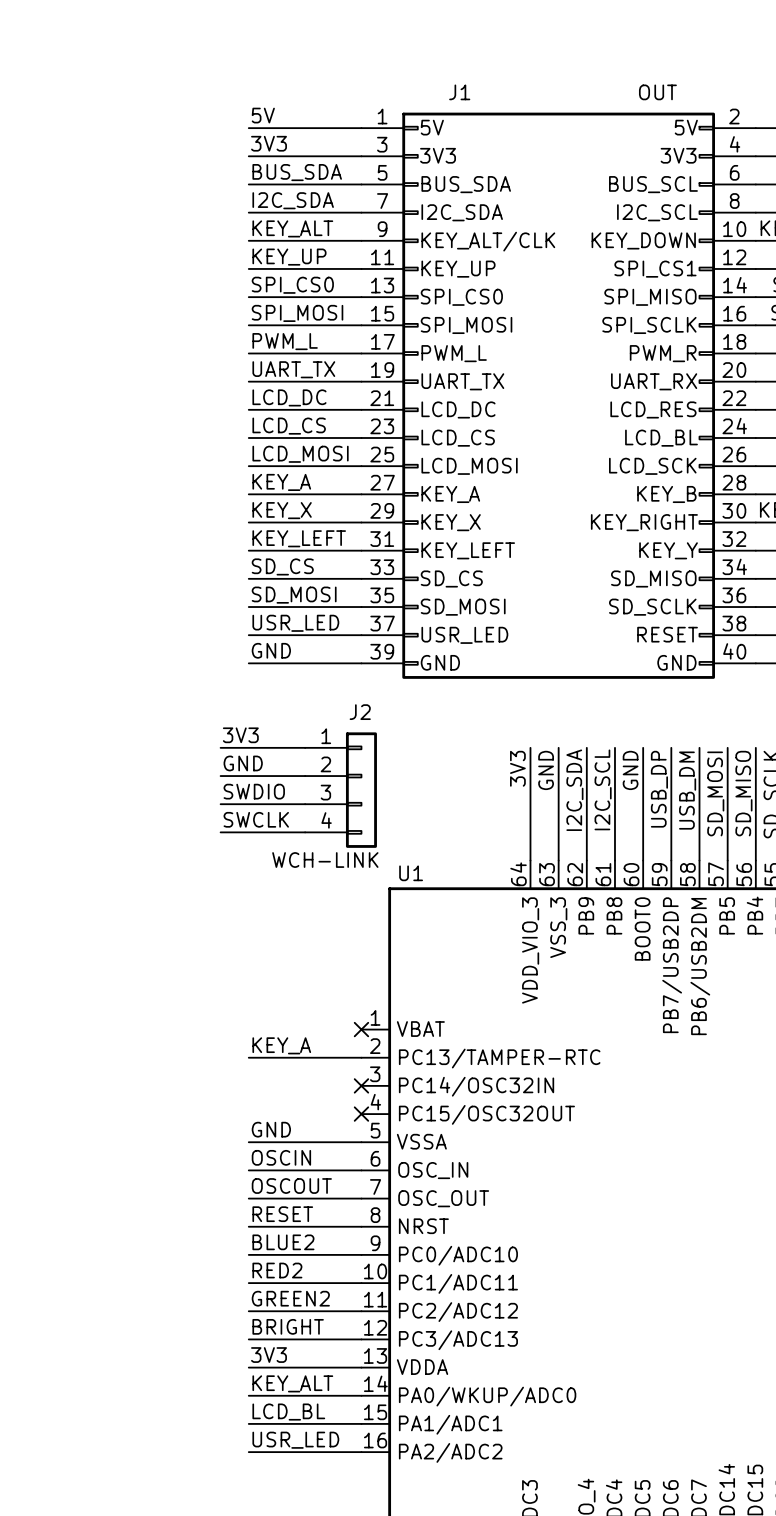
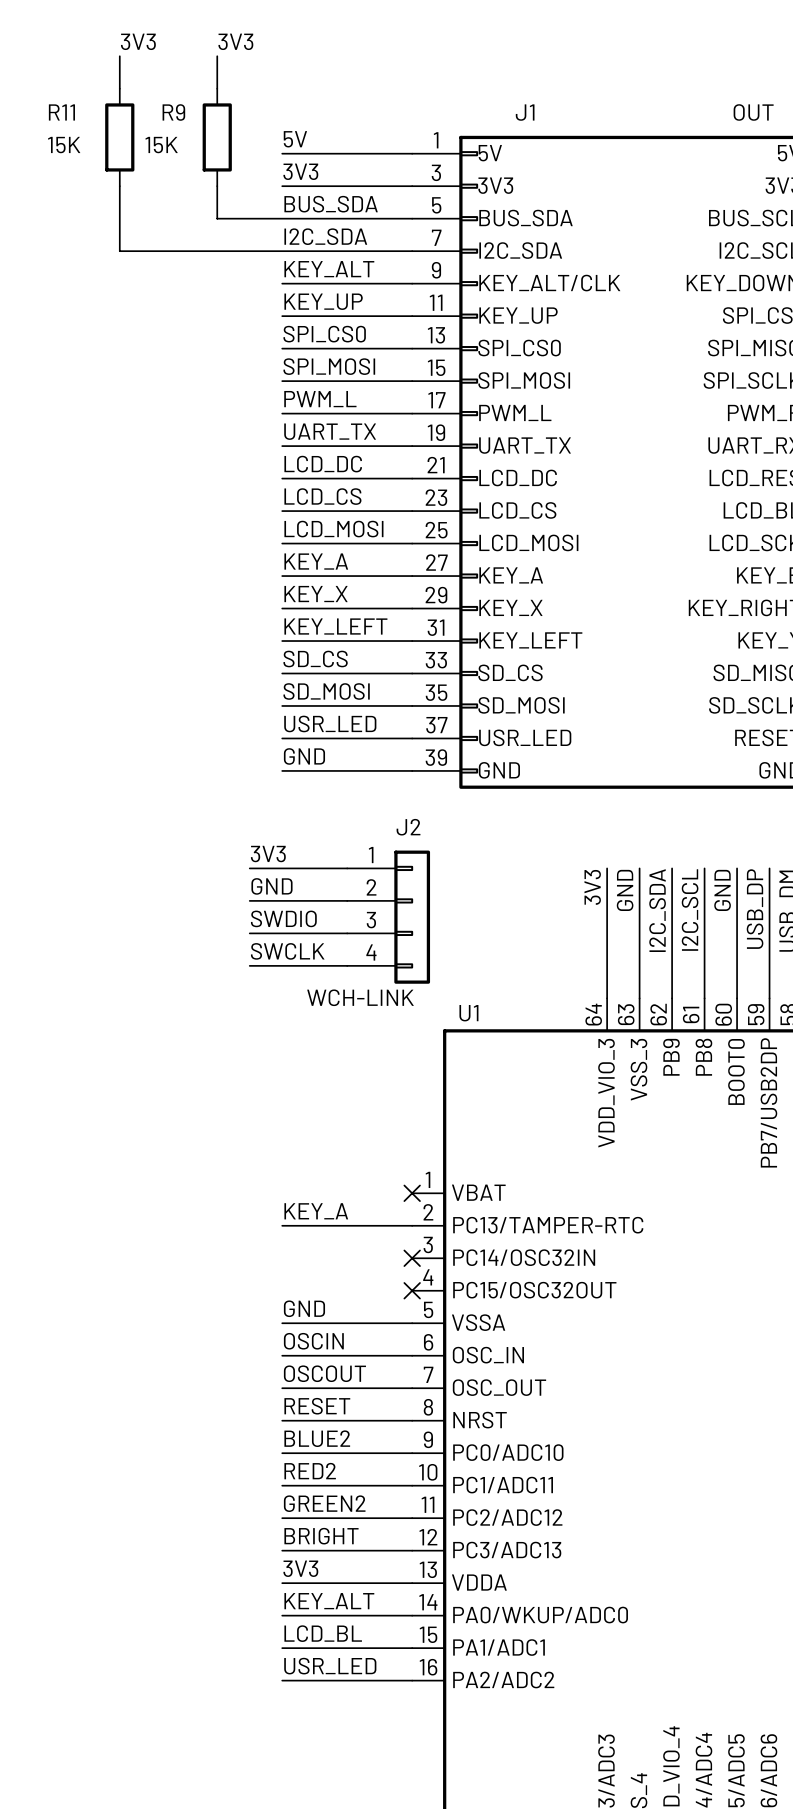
label: none -> 3V3 (138, 41)
label: none -> 3V3 (235, 41)
wire: none -> (119, 56) (119, 88)
wire: none -> (217, 56) (217, 88)
R11: none -> 15K (119, 137)
R9: none -> 15K (217, 137)
wire: none -> (119, 186) (119, 251) (282, 251)
wire: none -> (217, 186) (217, 218) (282, 218)

